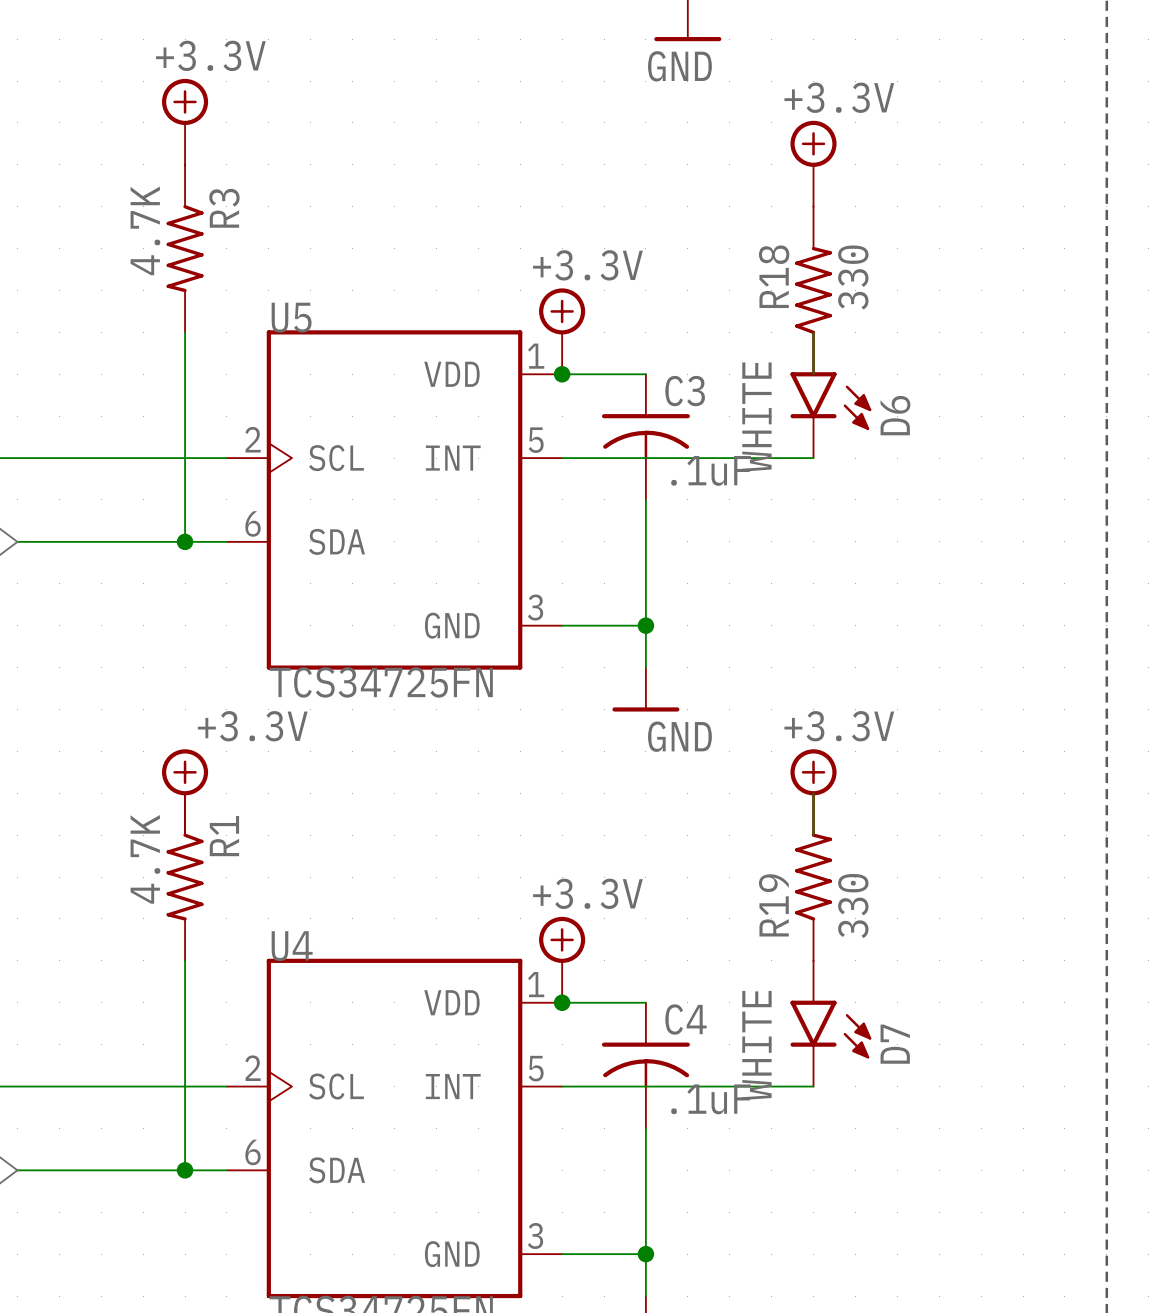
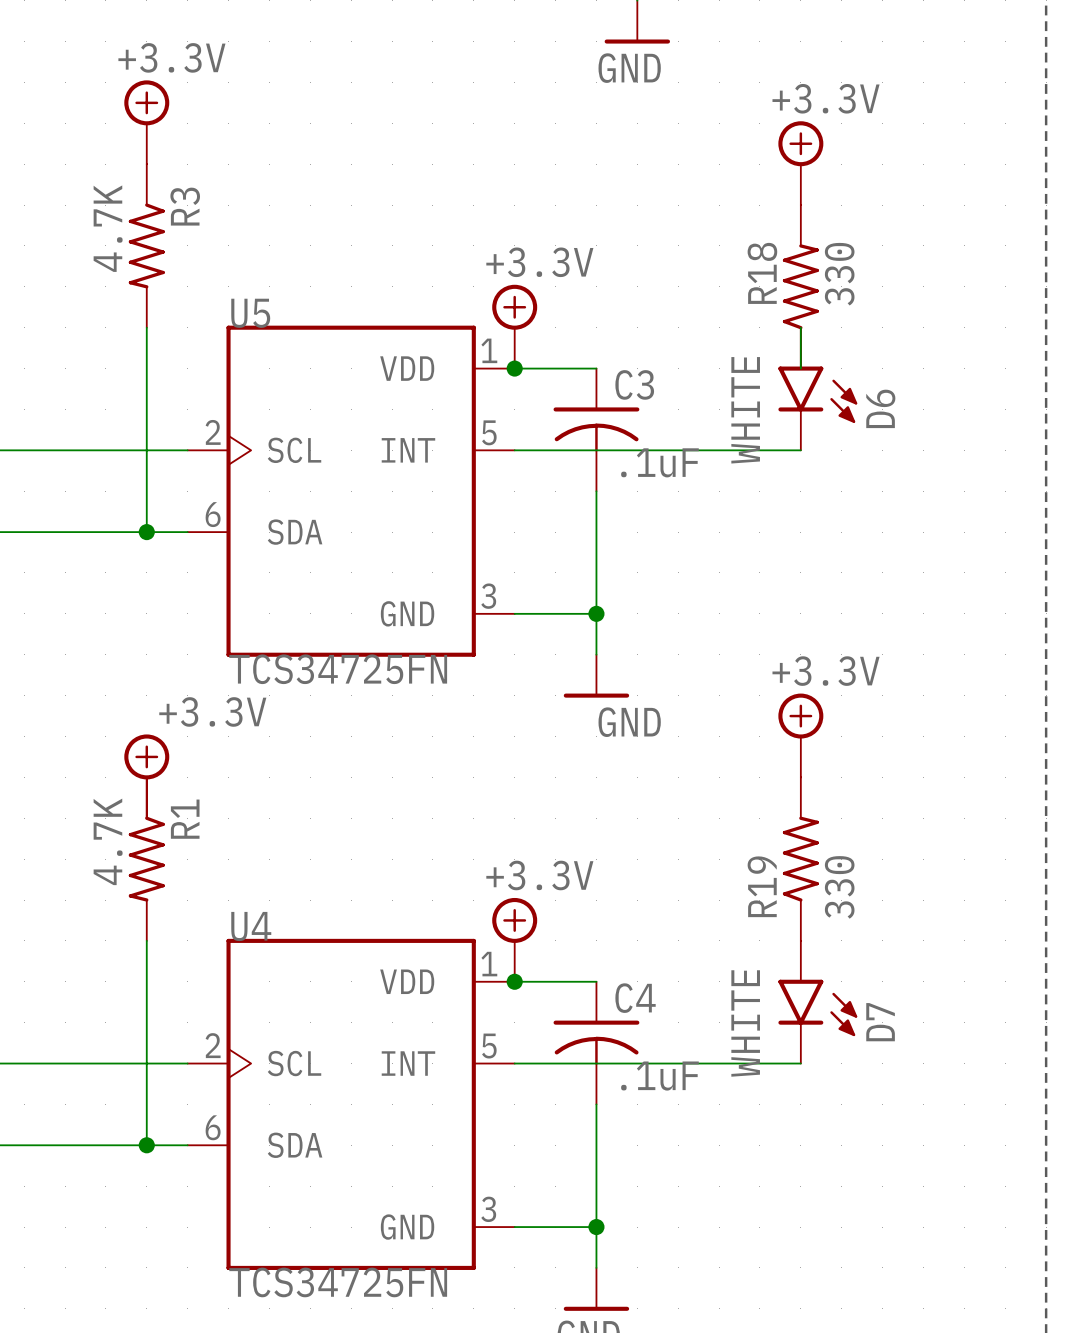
power symbol position: +3.3V (813, 163) -> +3.3V (800, 163)
R18 position: (813, 290) -> (800, 286)
wire: (813, 332) (813, 374) -> (800, 327) (800, 368)
D6 position: (830, 395) -> (817, 389)
wire: none -> (759, 450) (800, 450)
power symbol position: +3.3V (813, 792) -> +3.3V (800, 735)
wire: (813, 793) (813, 835) -> none
R19 position: (813, 877) -> (800, 859)
D7 position: (830, 1023) -> (817, 1002)
wire: none -> (759, 1063) (800, 1063)

